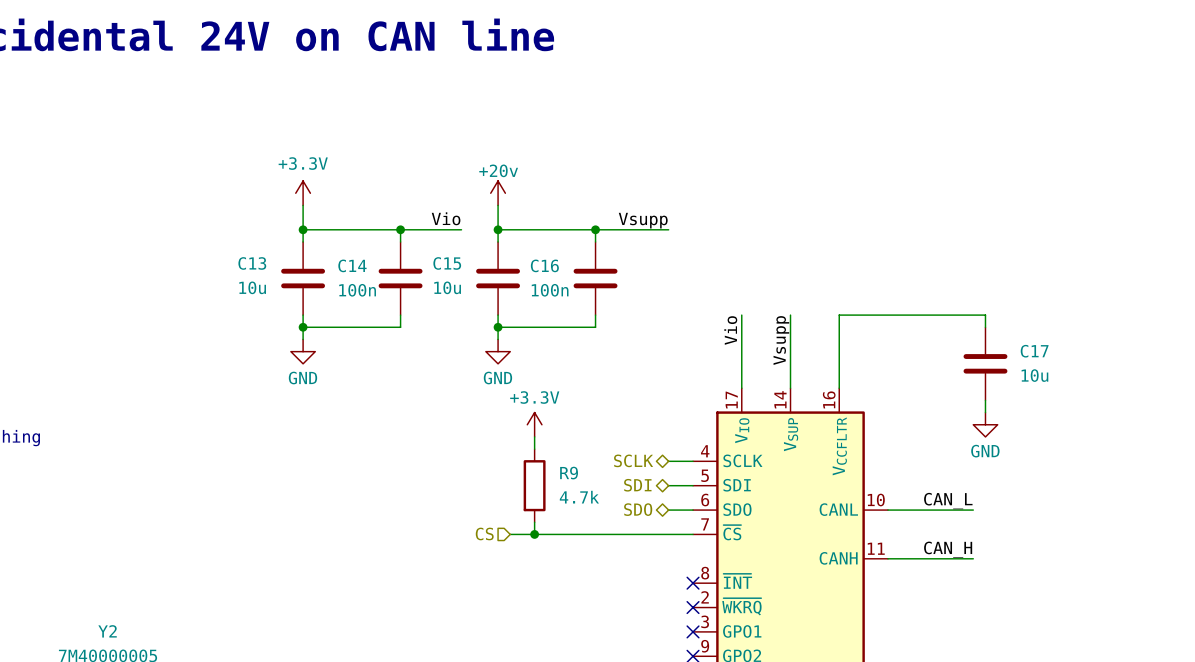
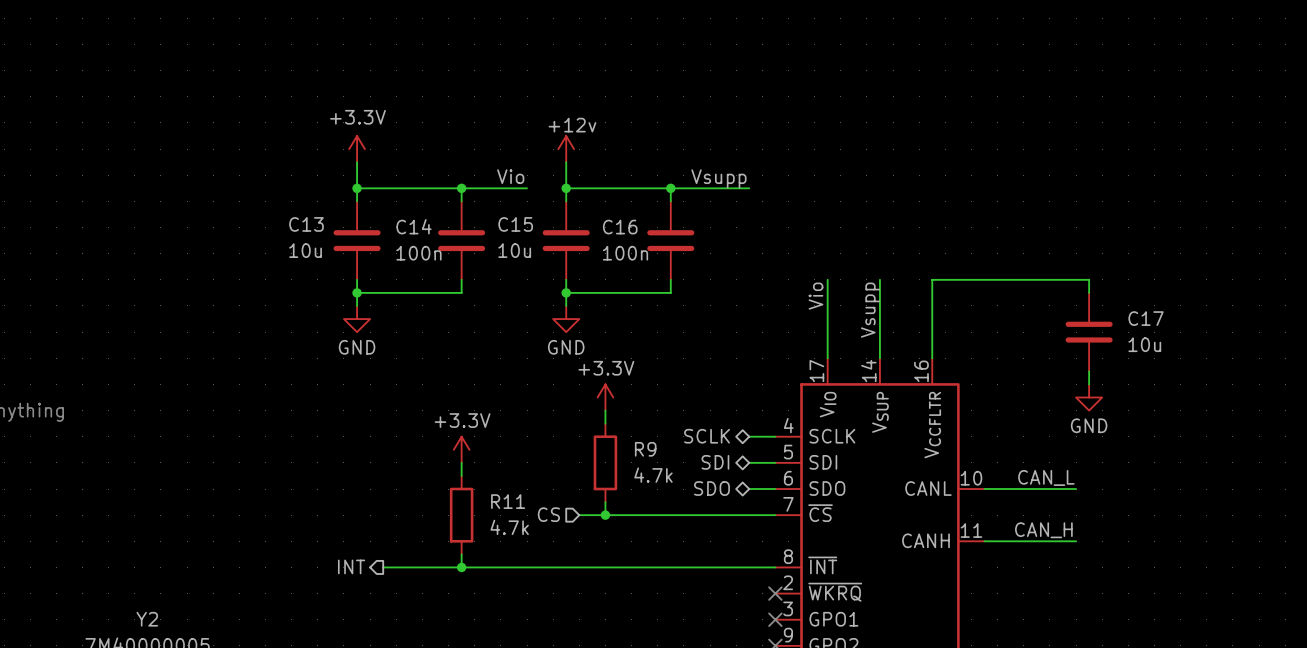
power symbol: +20v (498, 193) -> +12v (566, 149)
power symbol: none -> +3.3V (461, 449)
wire: none -> (461, 462) (461, 475)
R11: none -> 4.7k (461, 515)
wire: none -> (461, 554) (461, 567)
hierarchical label: none -> INT (351, 566)
wire: none -> (383, 567) (775, 567)
junction: none -> (461, 567)
no-connect mark: (693, 583) -> none

